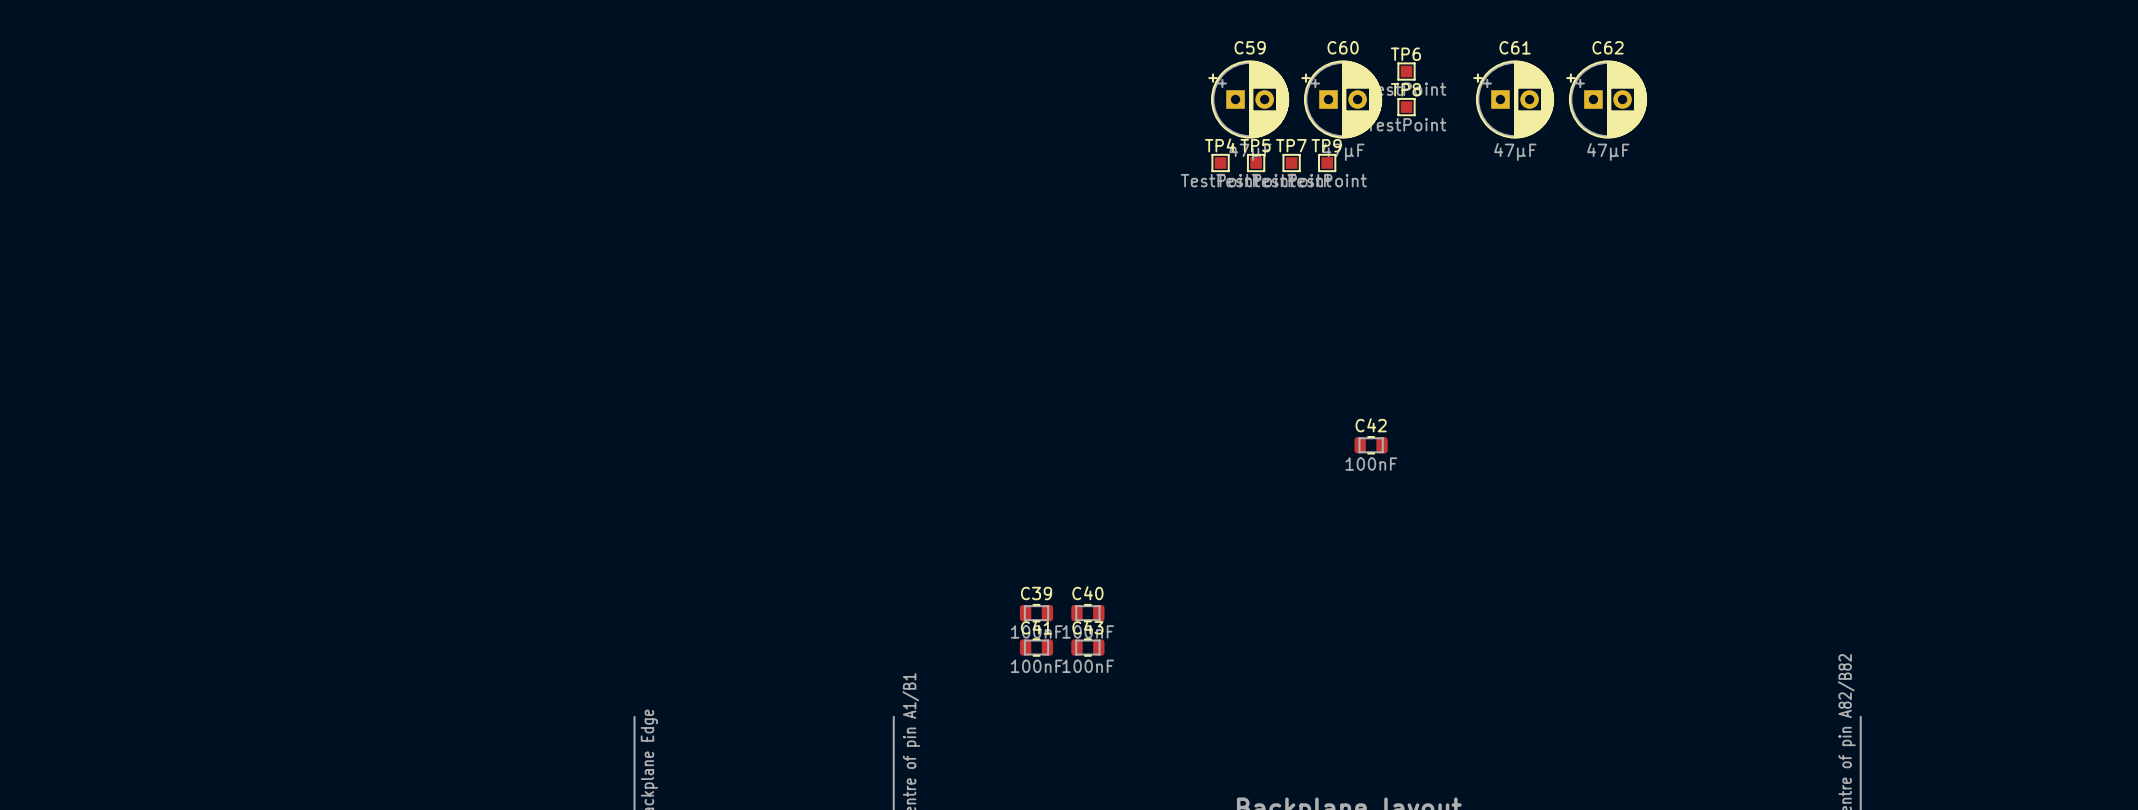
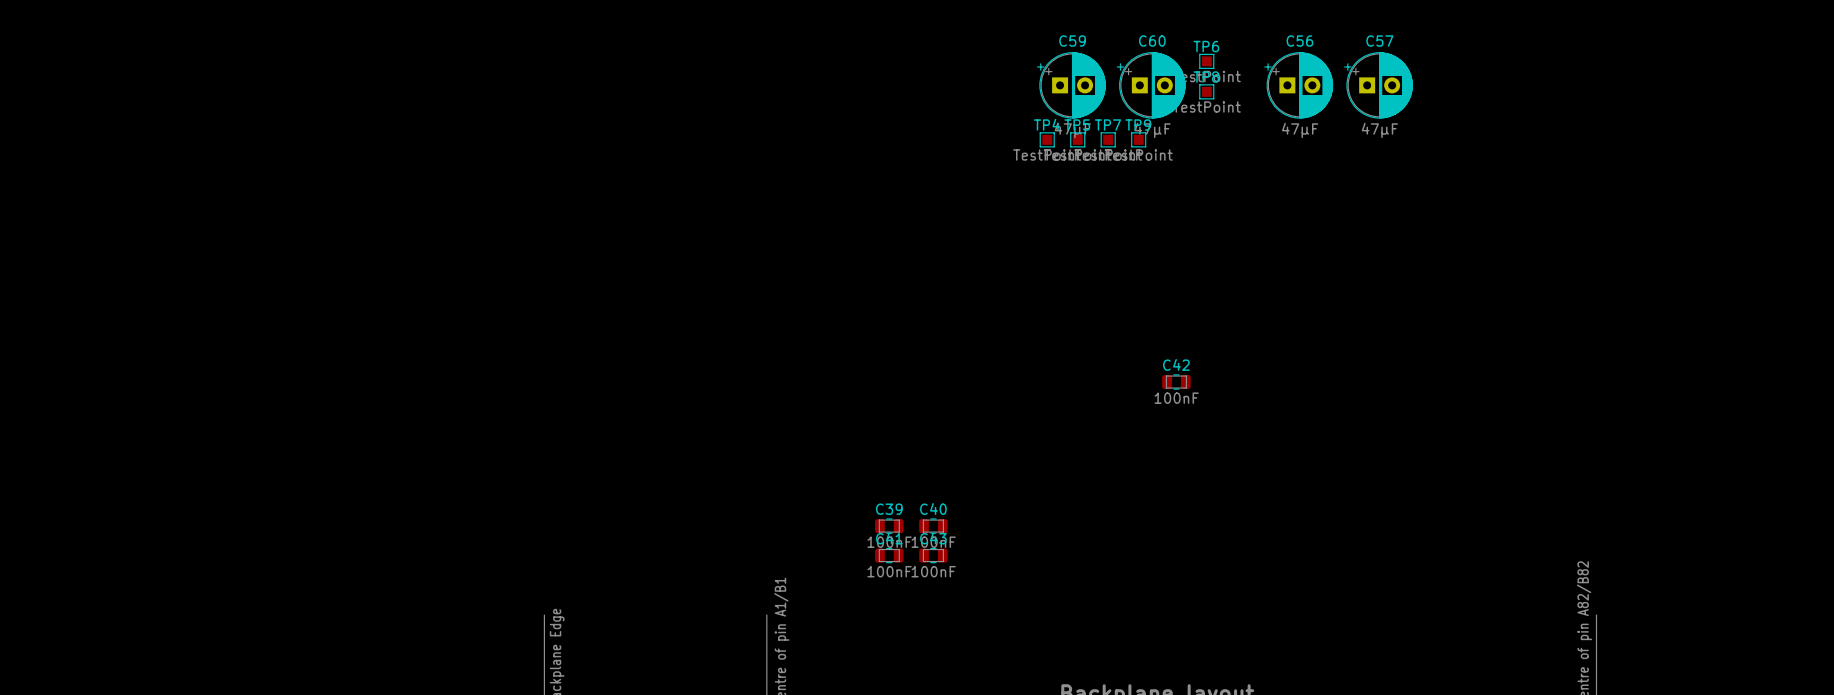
C61 name: C61 (1515, 47) -> C56 (1299, 41)
C62 name: C62 (1608, 47) -> C57 (1379, 41)

